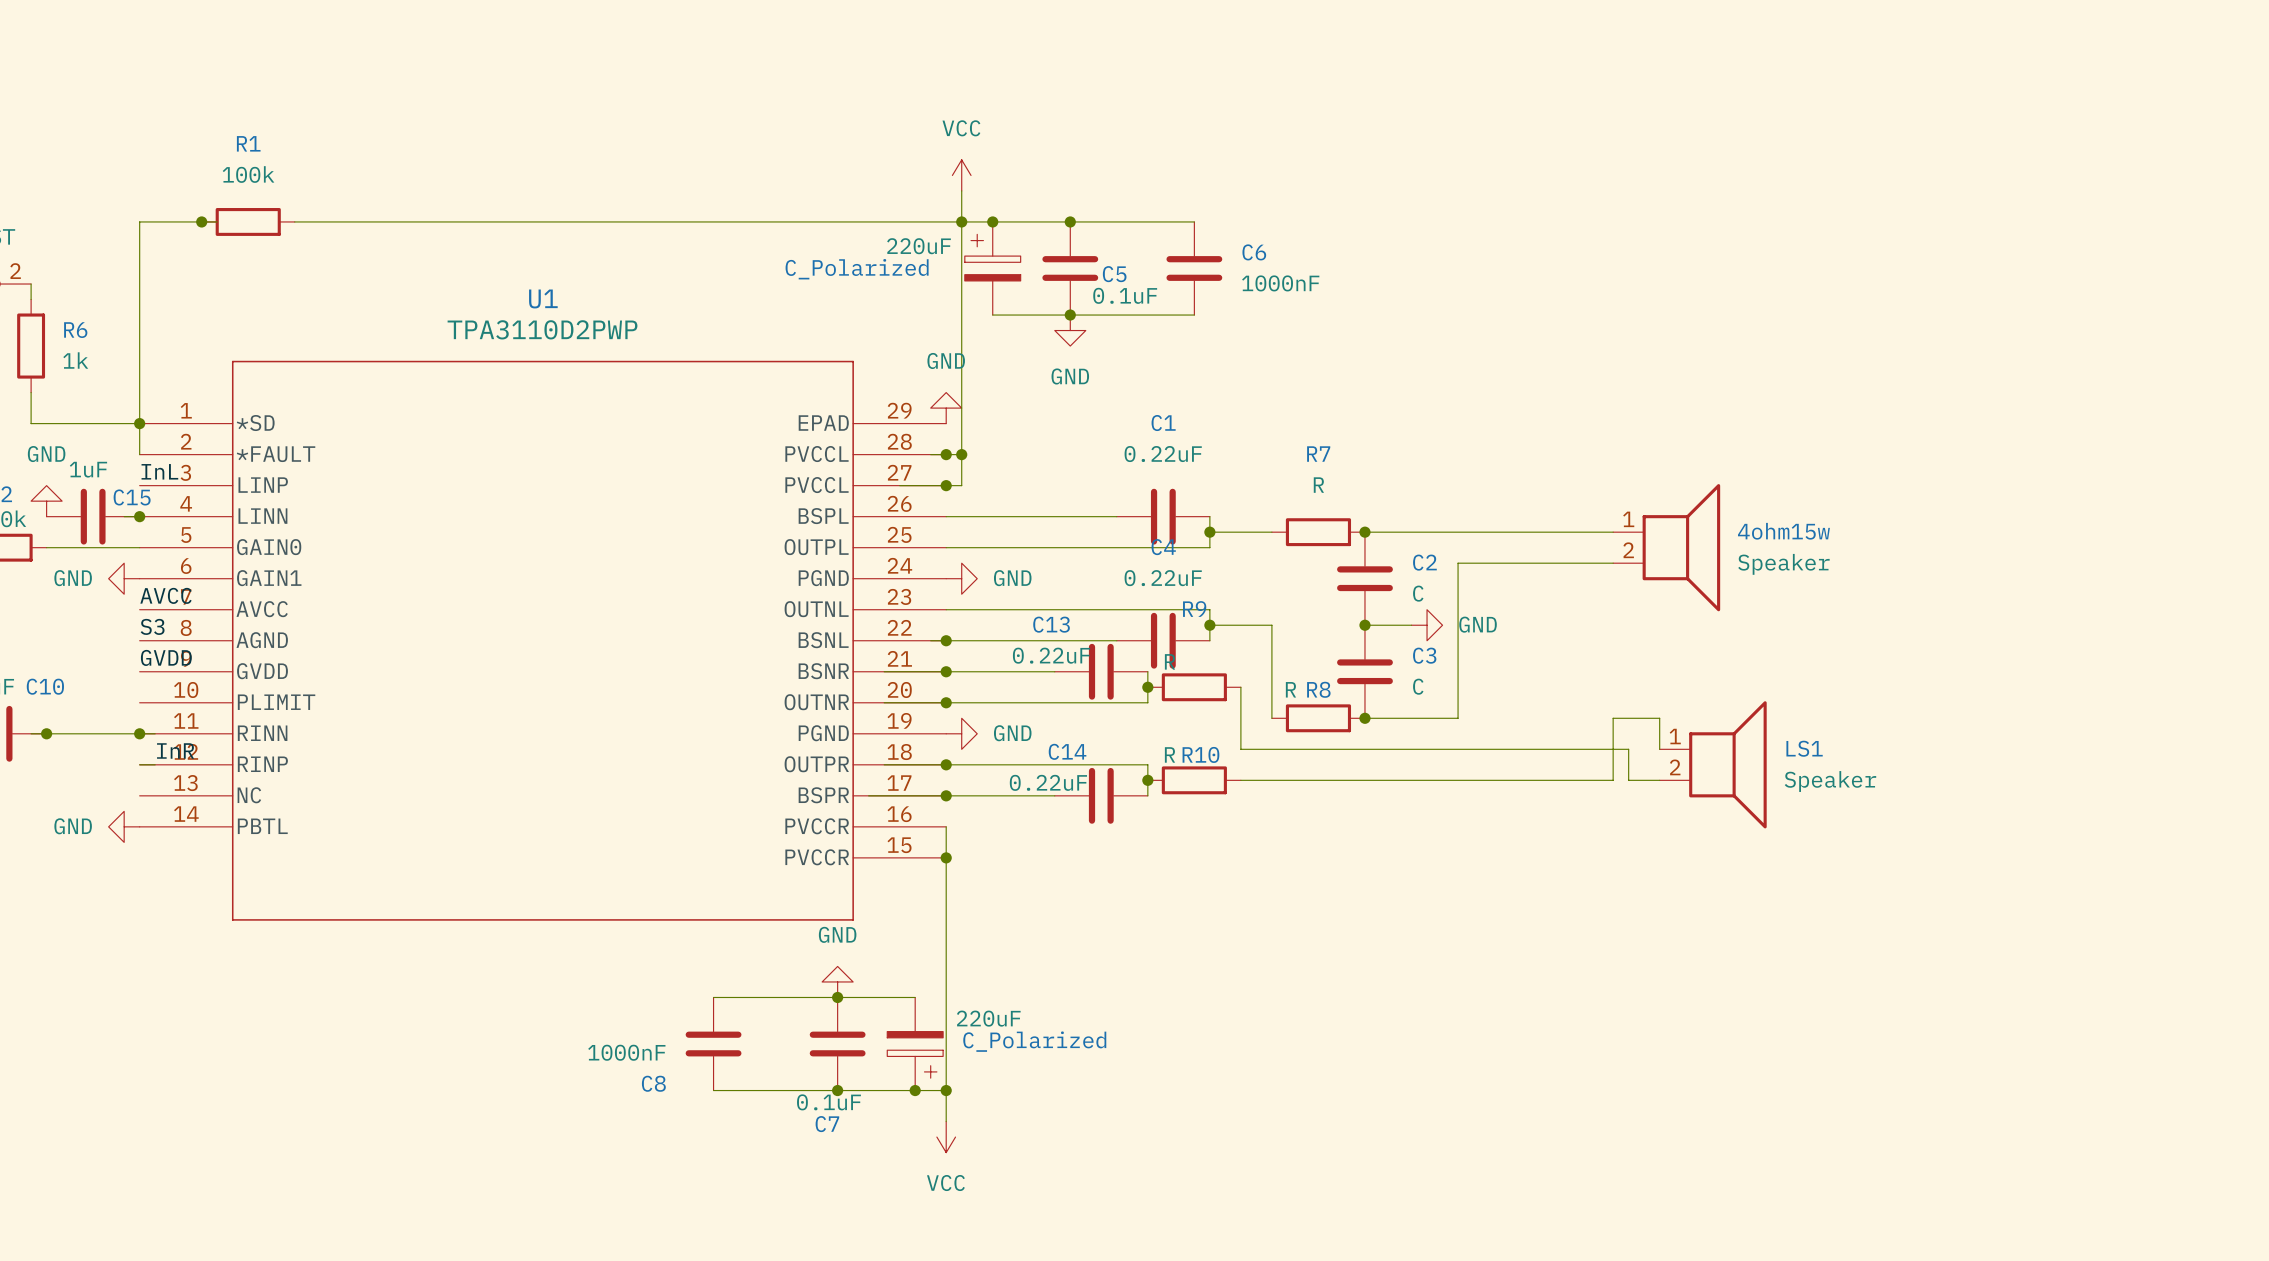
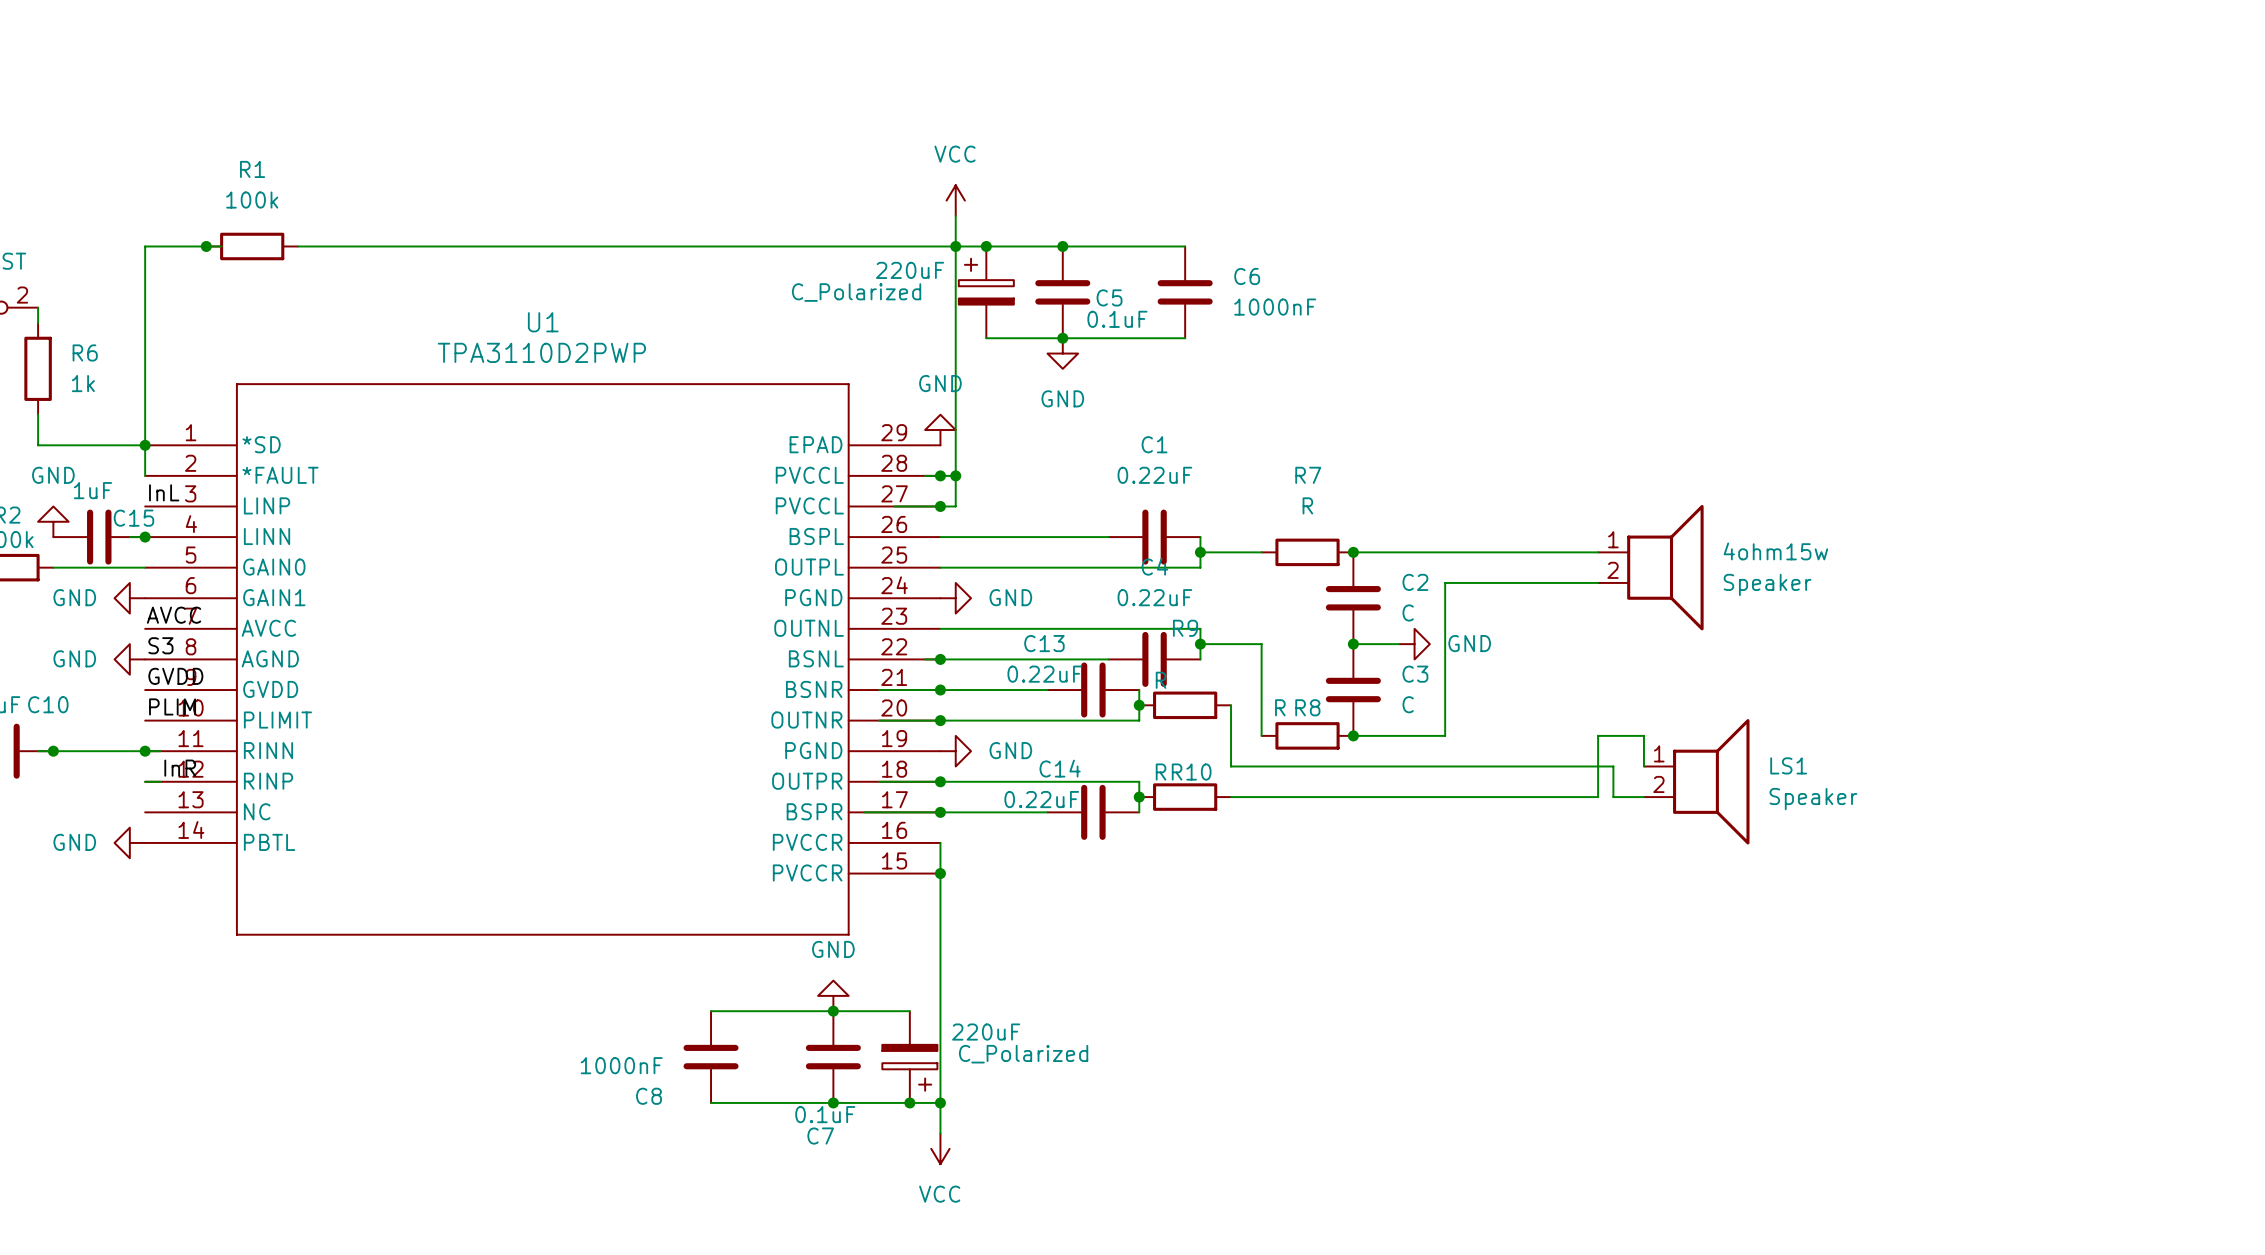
power symbol: none -> GND (129, 659)
label: none -> PLIM (172, 706)

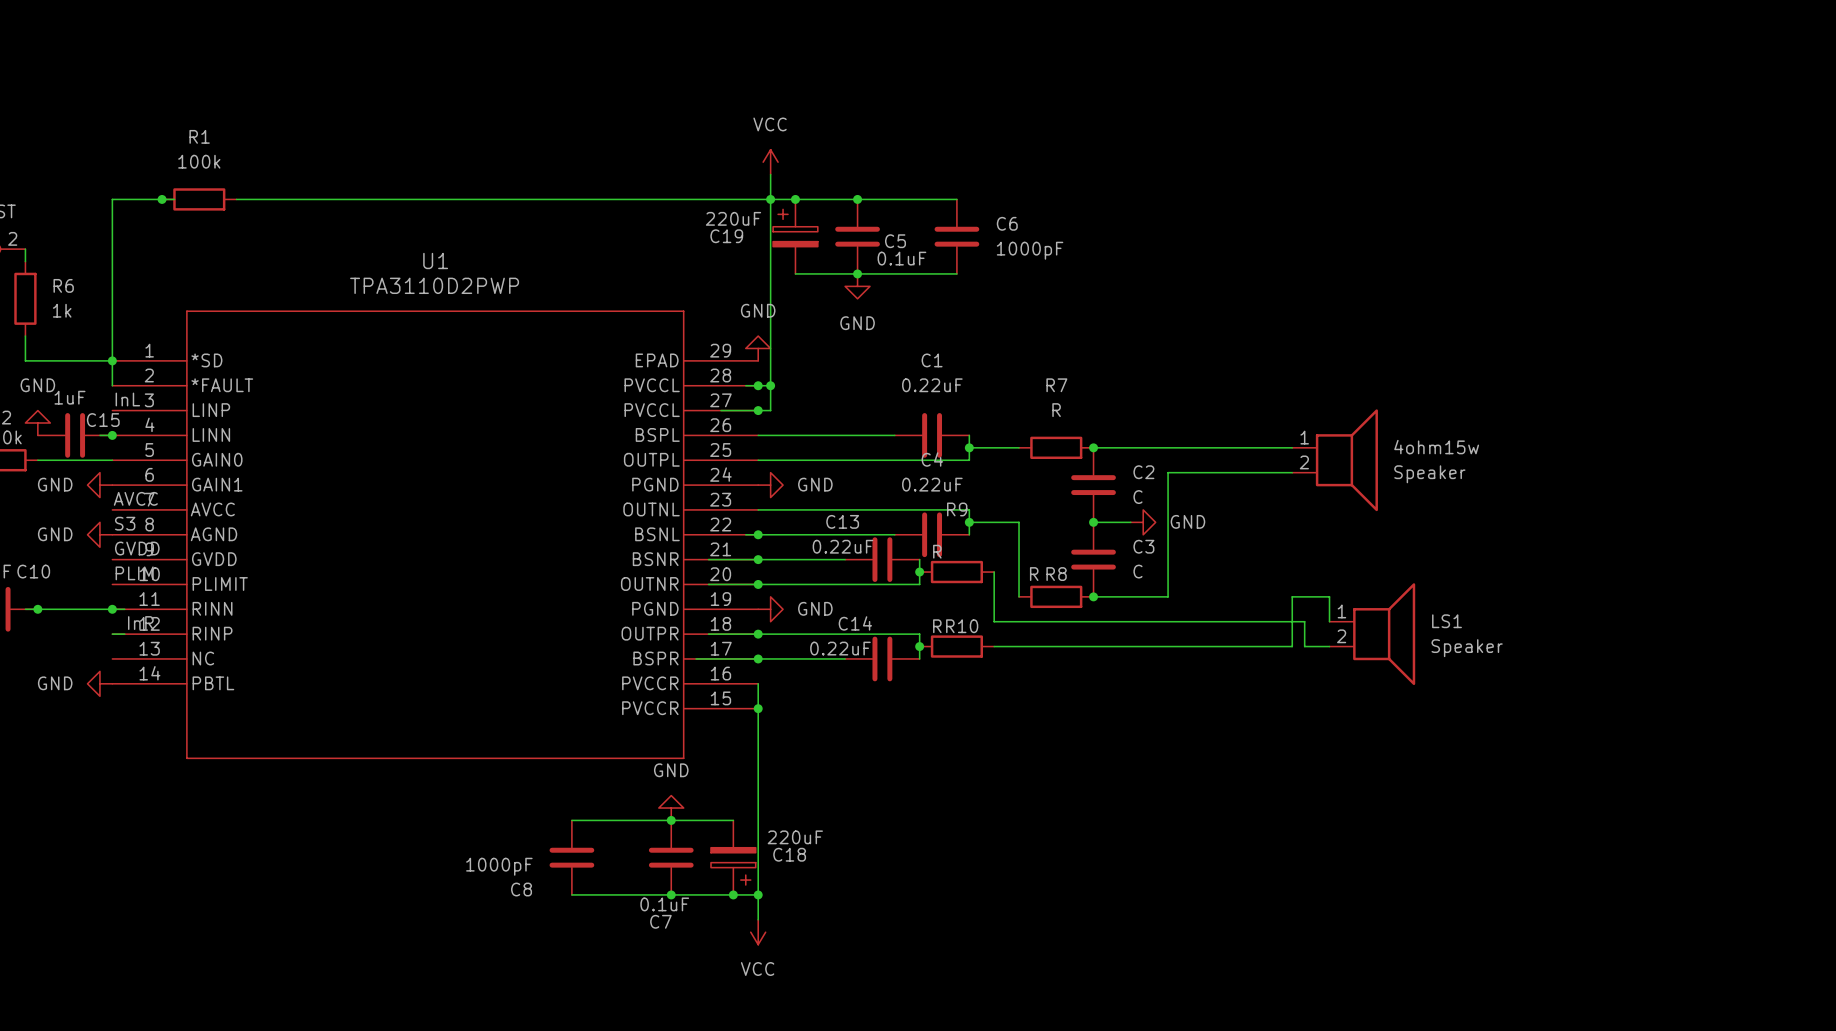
C_Polarized name: C_Polarized (856, 292) -> C19 (726, 236)
C6 value: 1000nF (1275, 307) -> 1000pF (1030, 250)
C_Polarized name: C_Polarized (1023, 1054) -> C18 (789, 854)
C8 value: 1000nF (621, 1065) -> 1000pF (499, 866)

